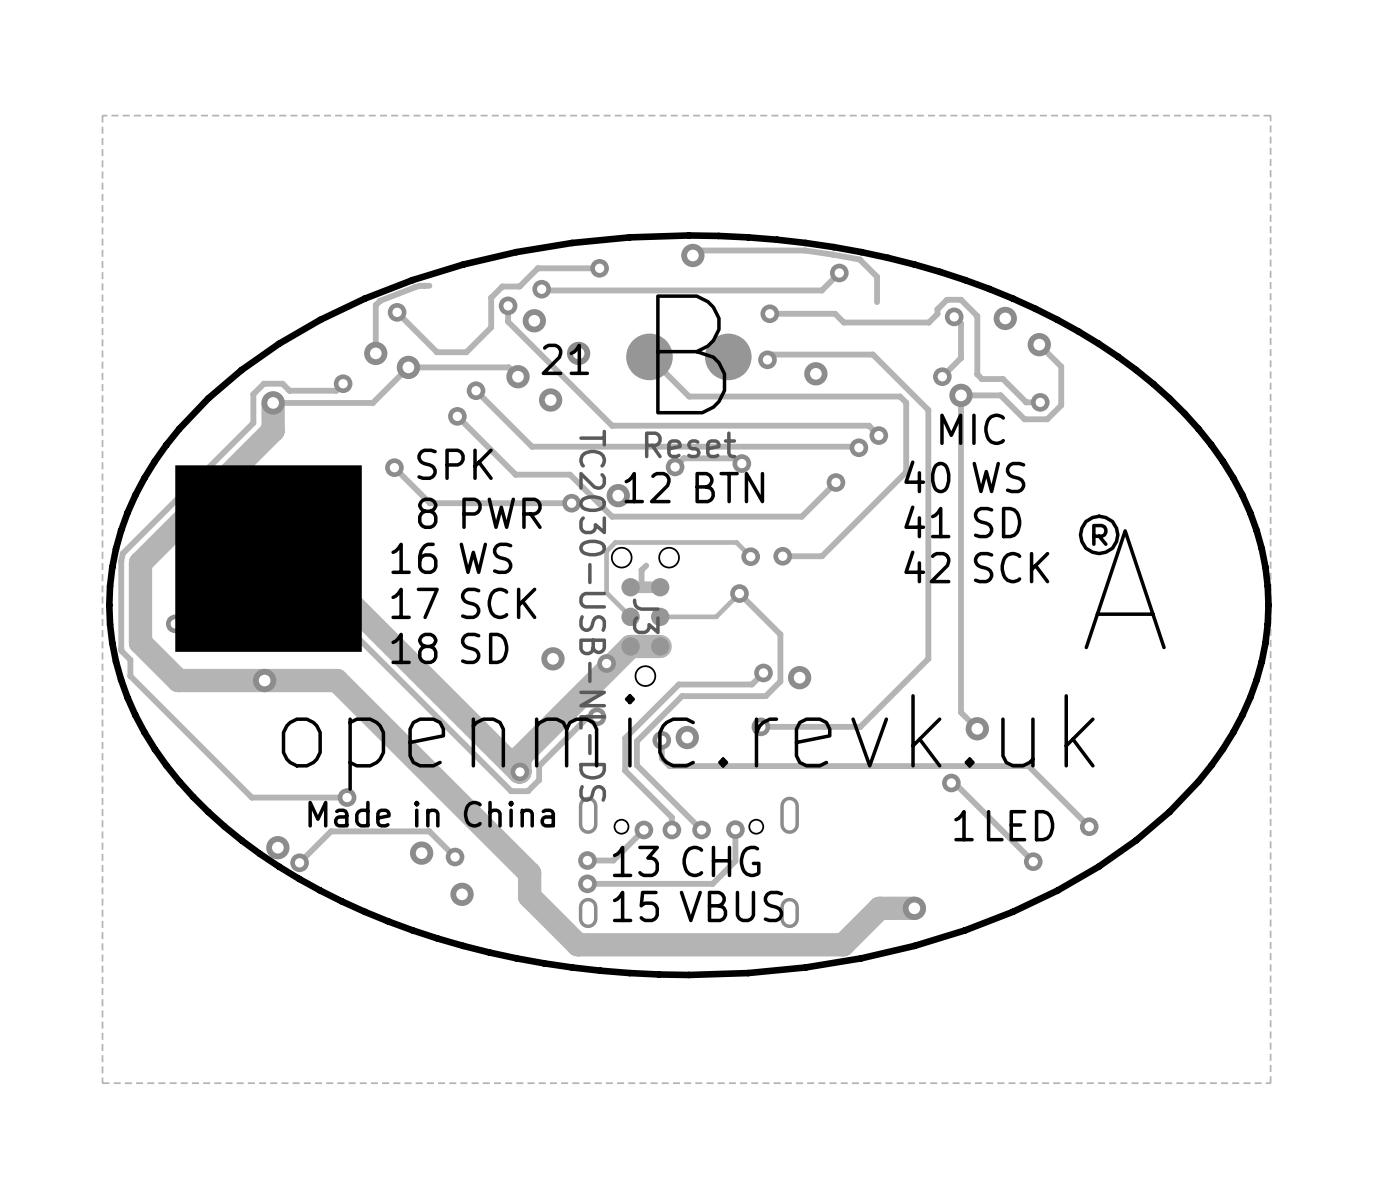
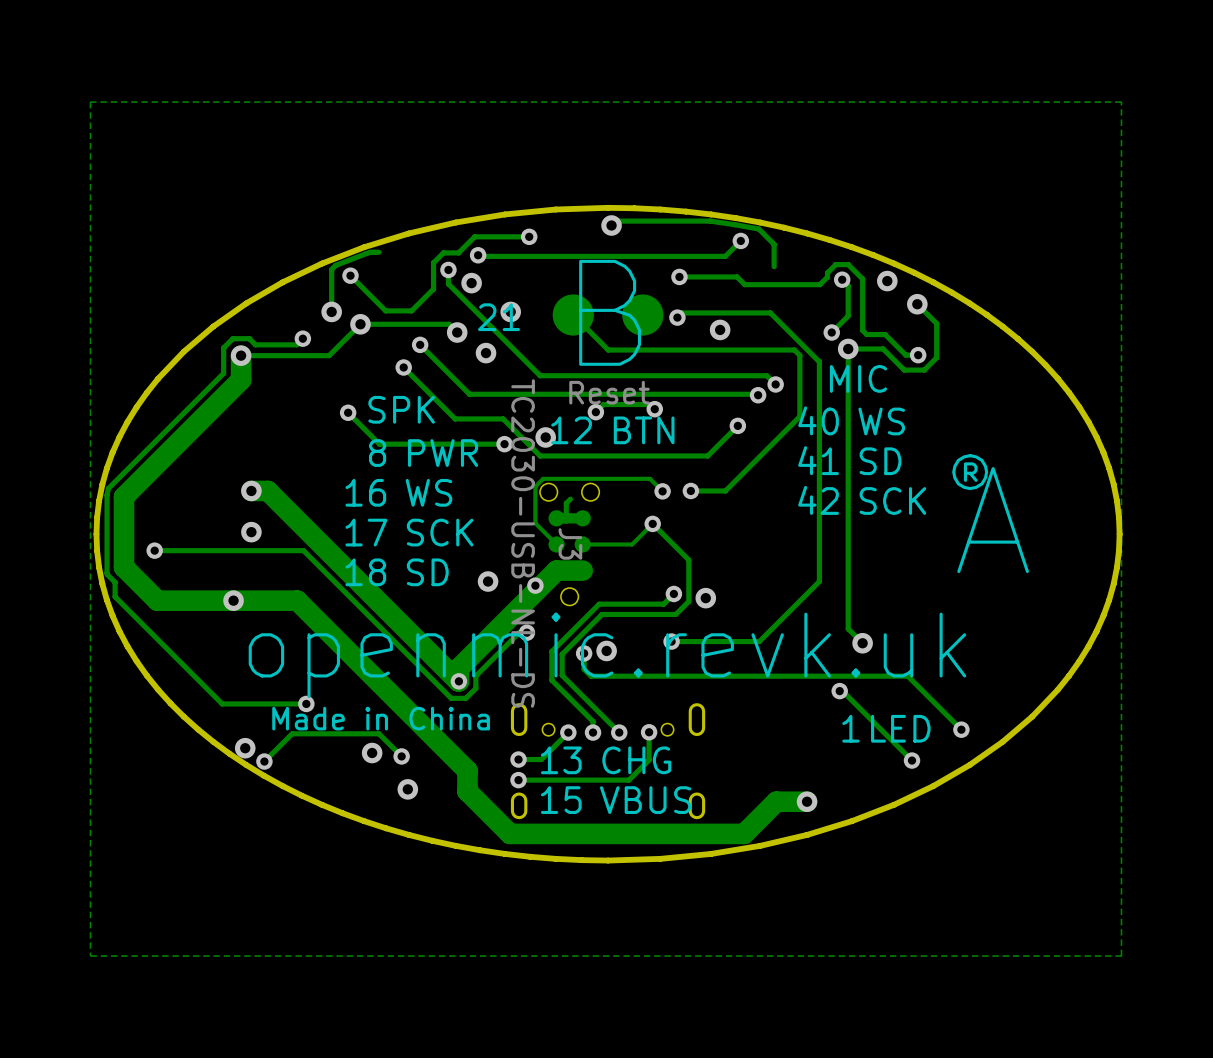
drawing: [175, 465, 362, 652] -> none

